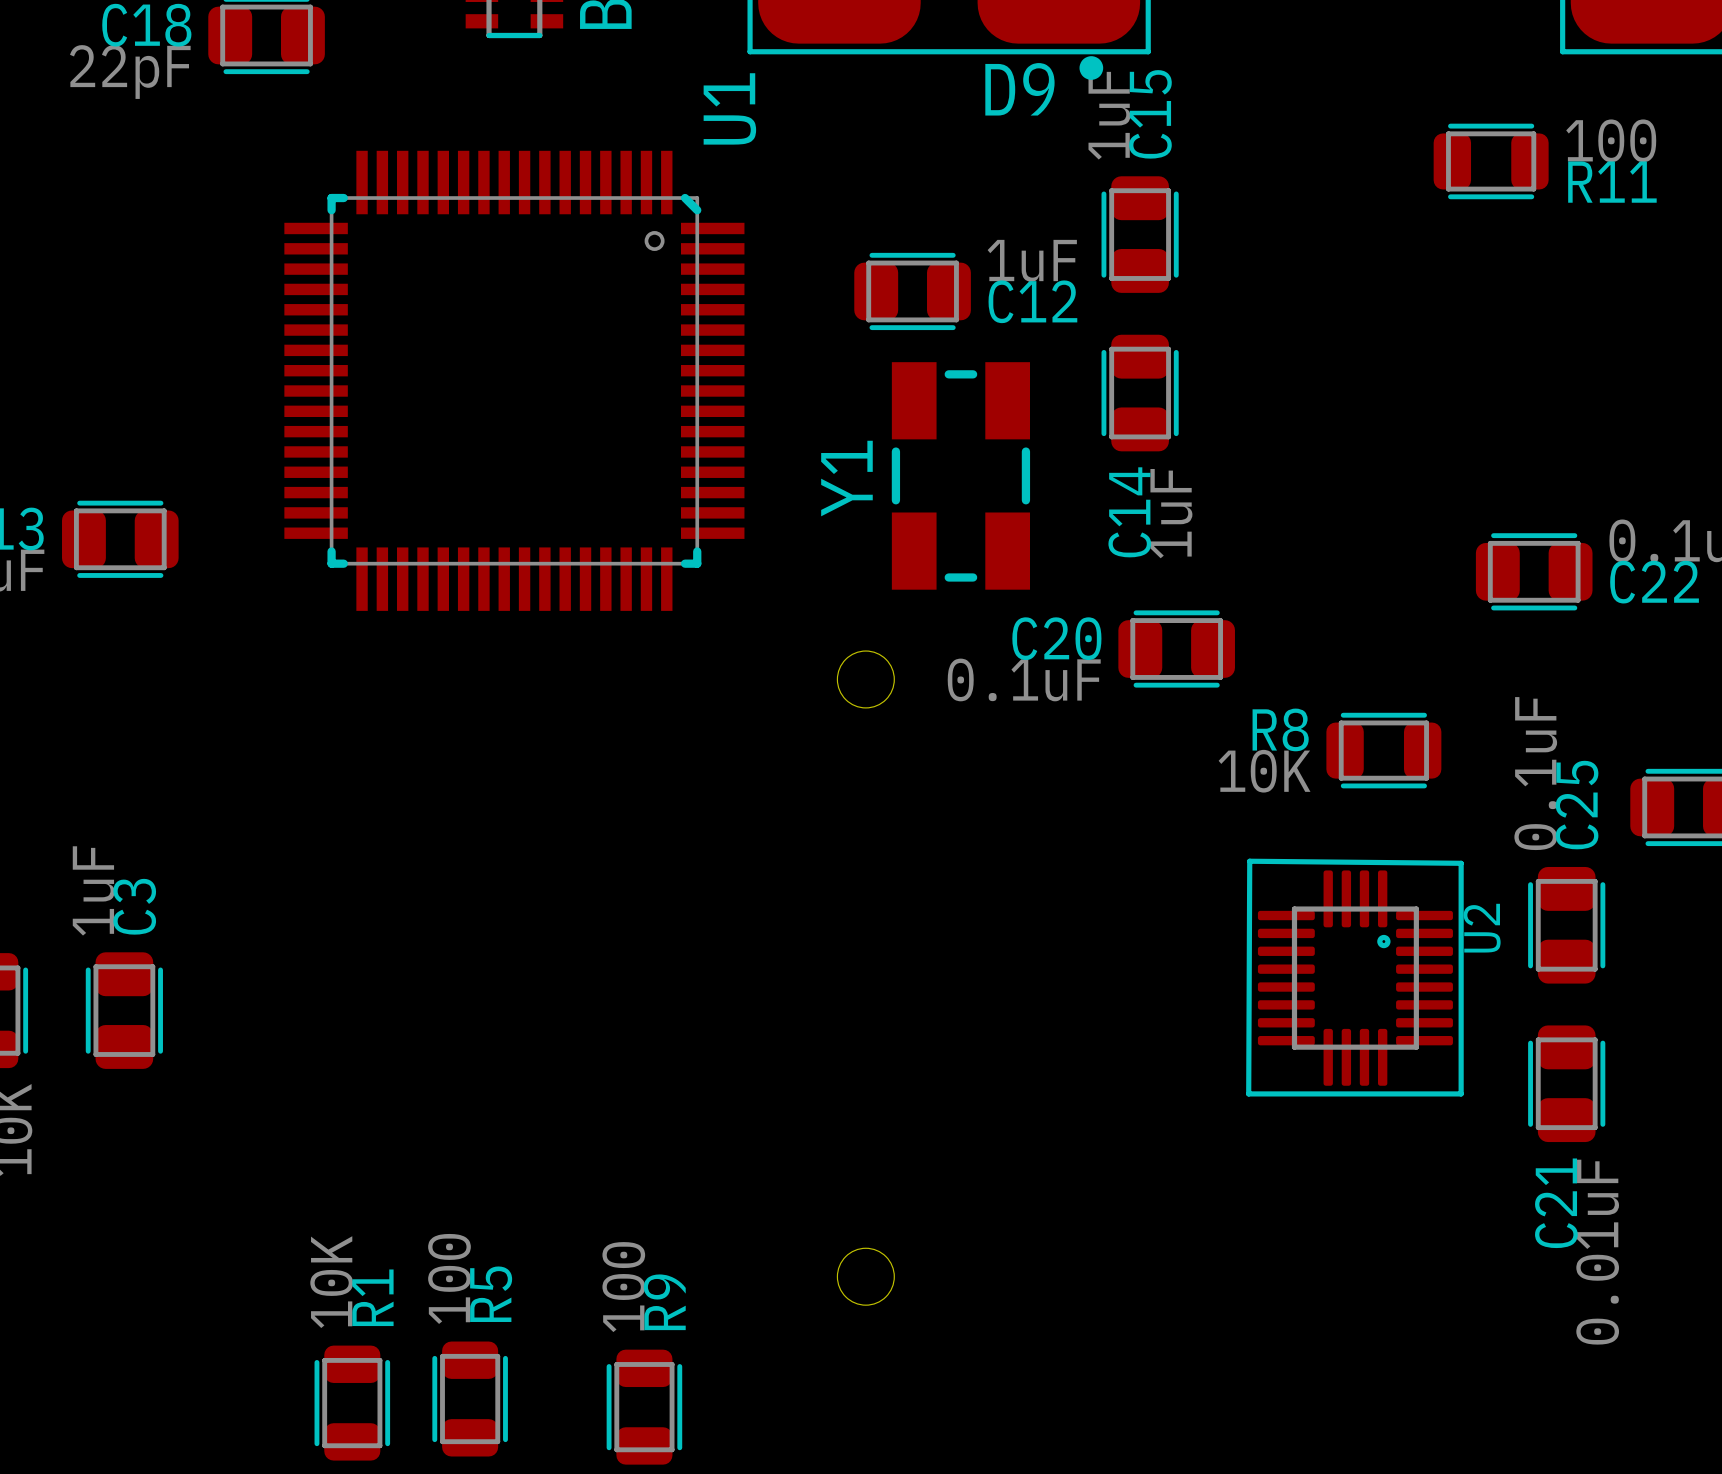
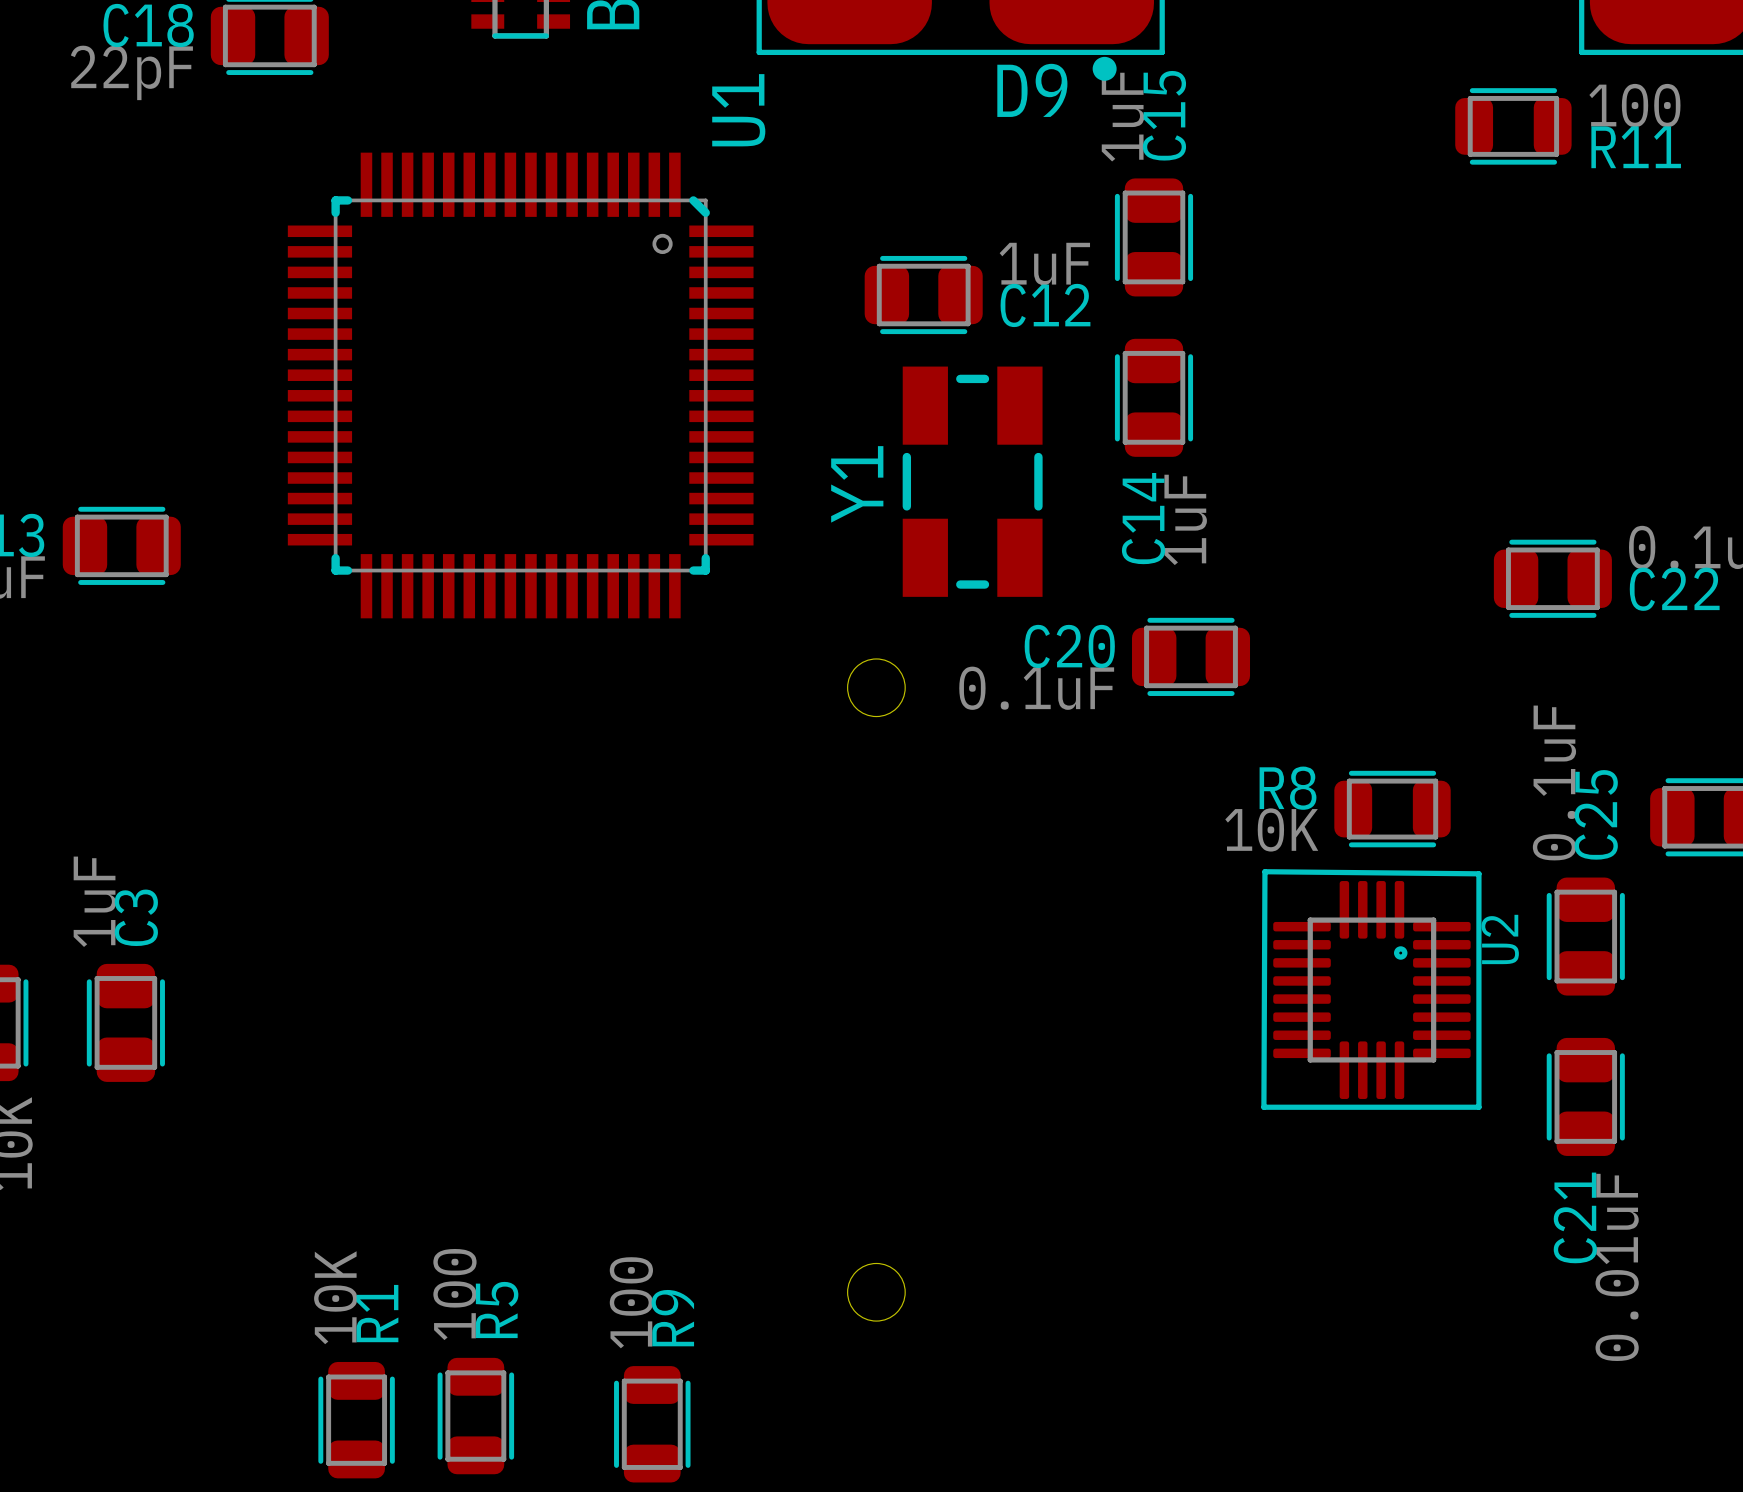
R11 position: (1491, 161) -> (1513, 126)
R8 position: (1383, 750) -> (1392, 809)

